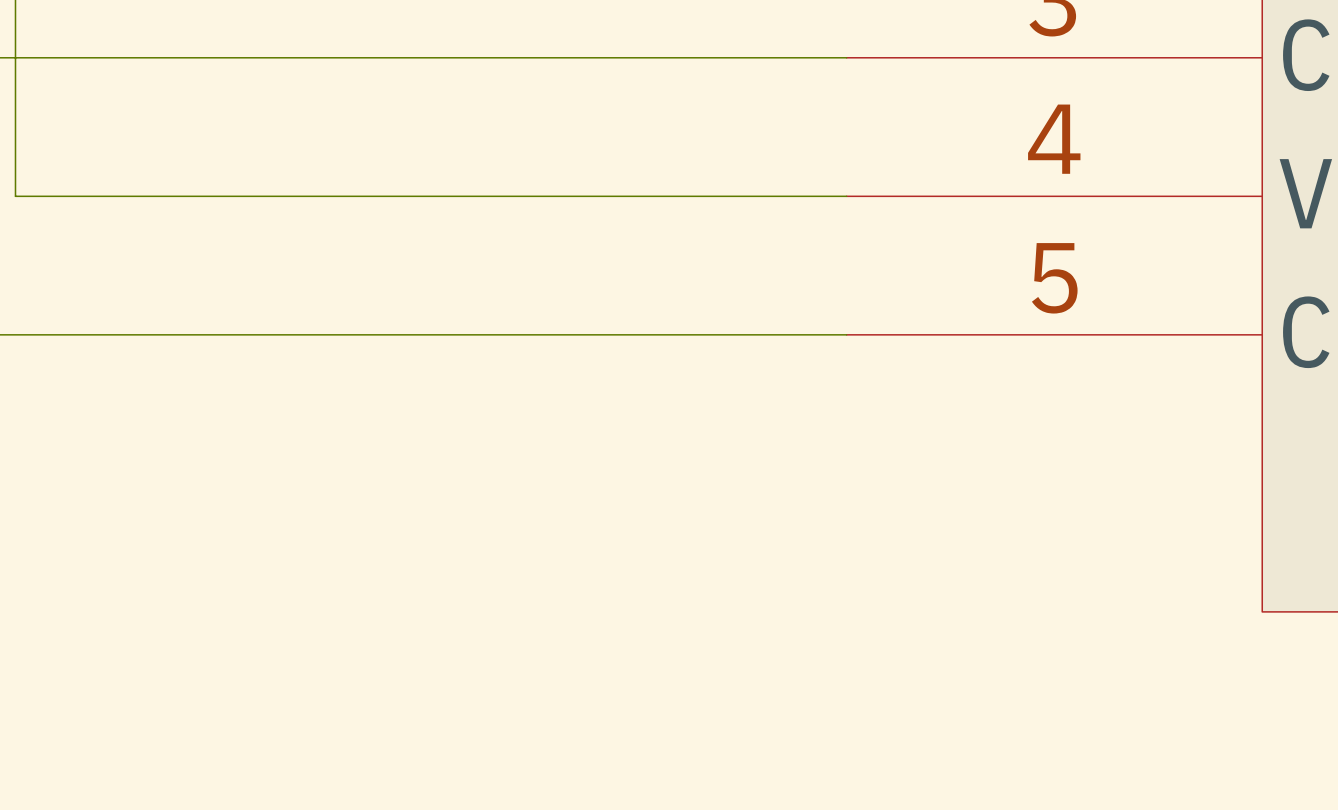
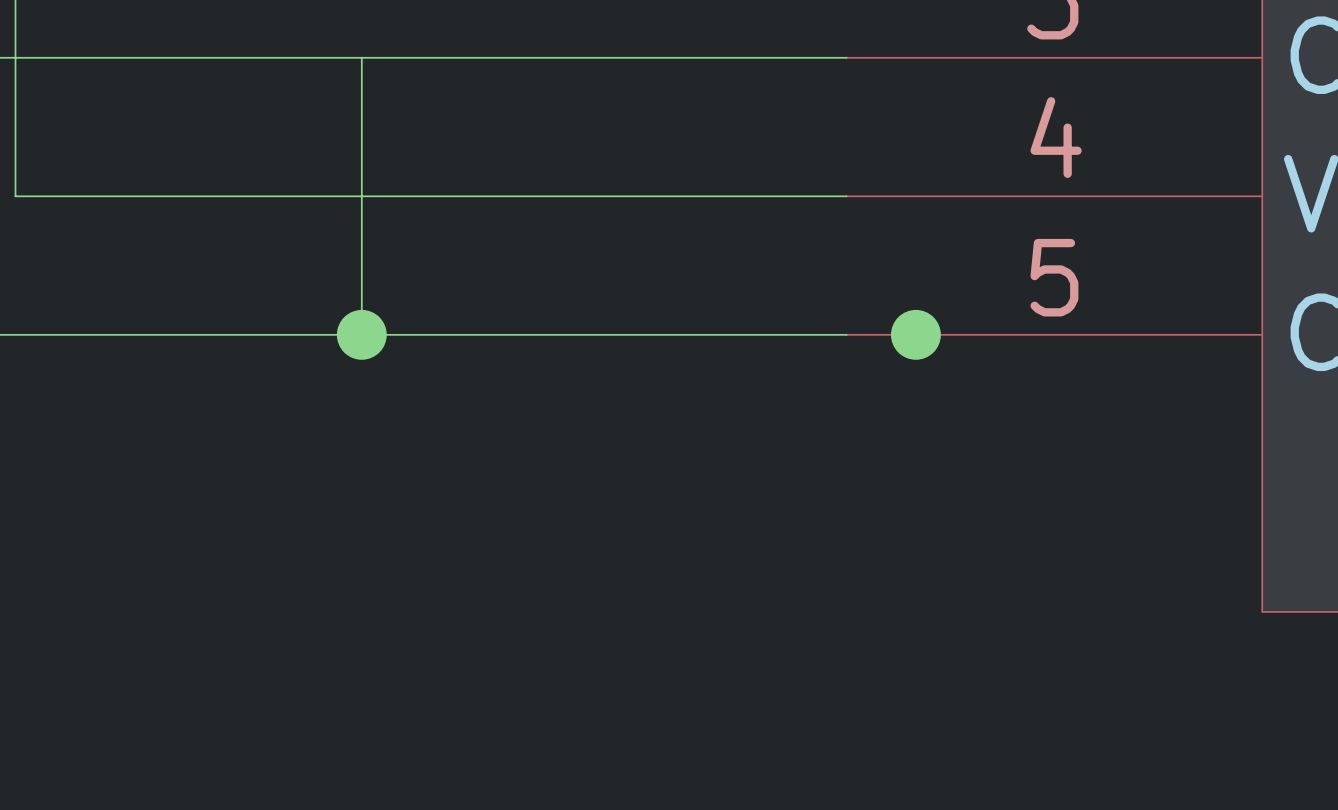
wire: none -> (361, 57) (361, 334)
junction: none -> (361, 334)
junction: none -> (915, 334)

